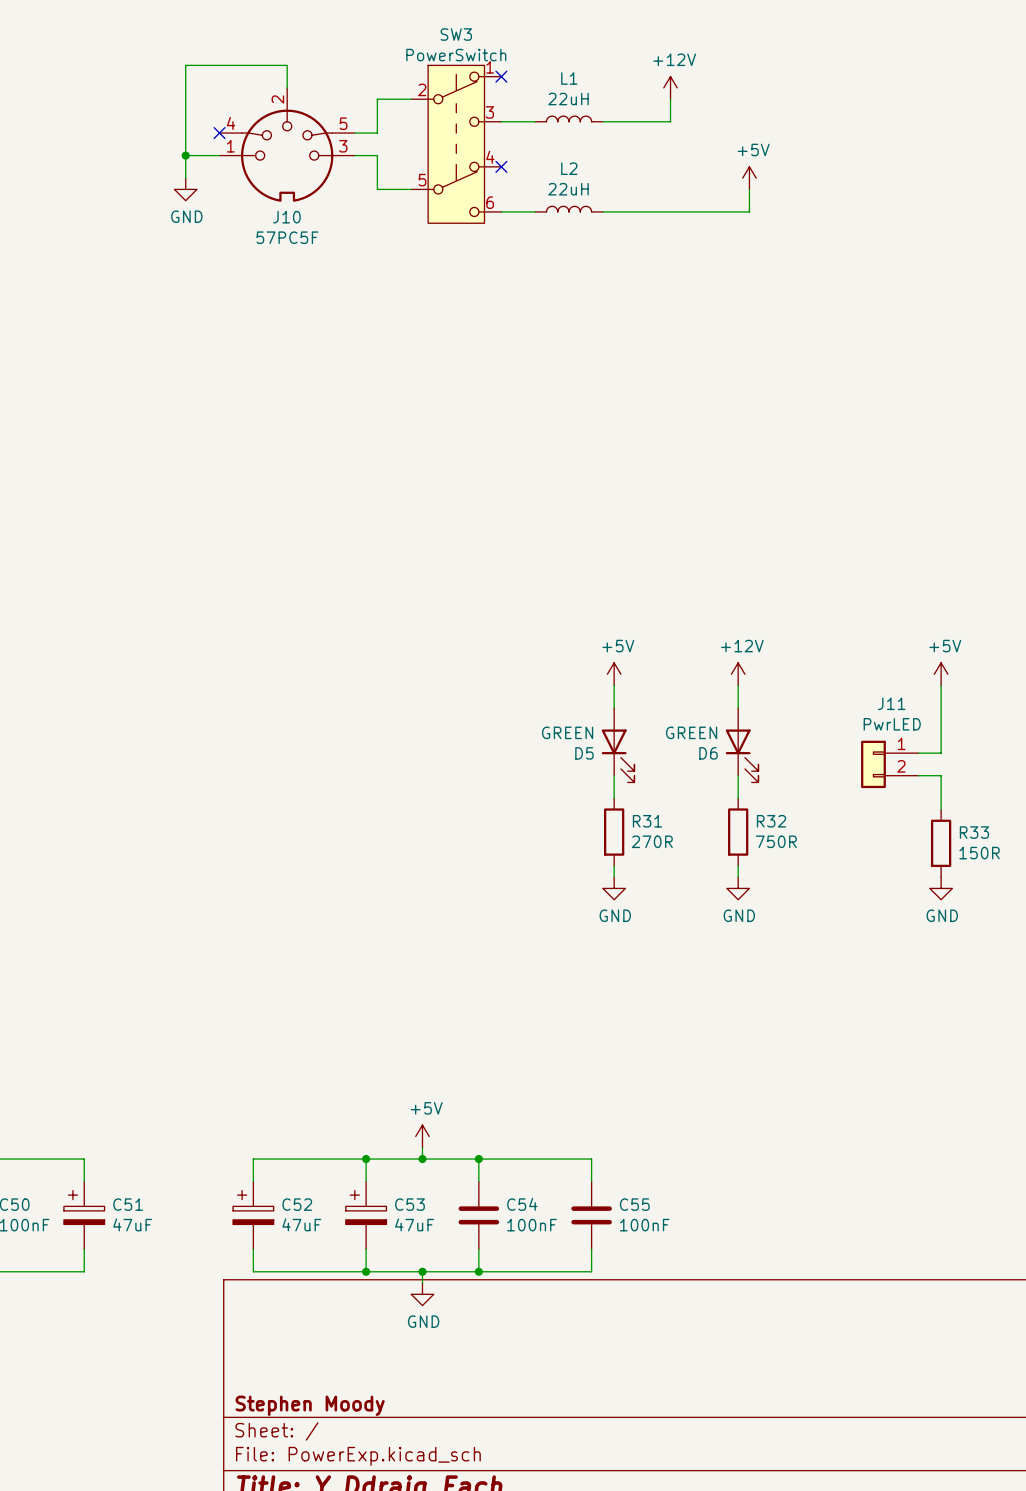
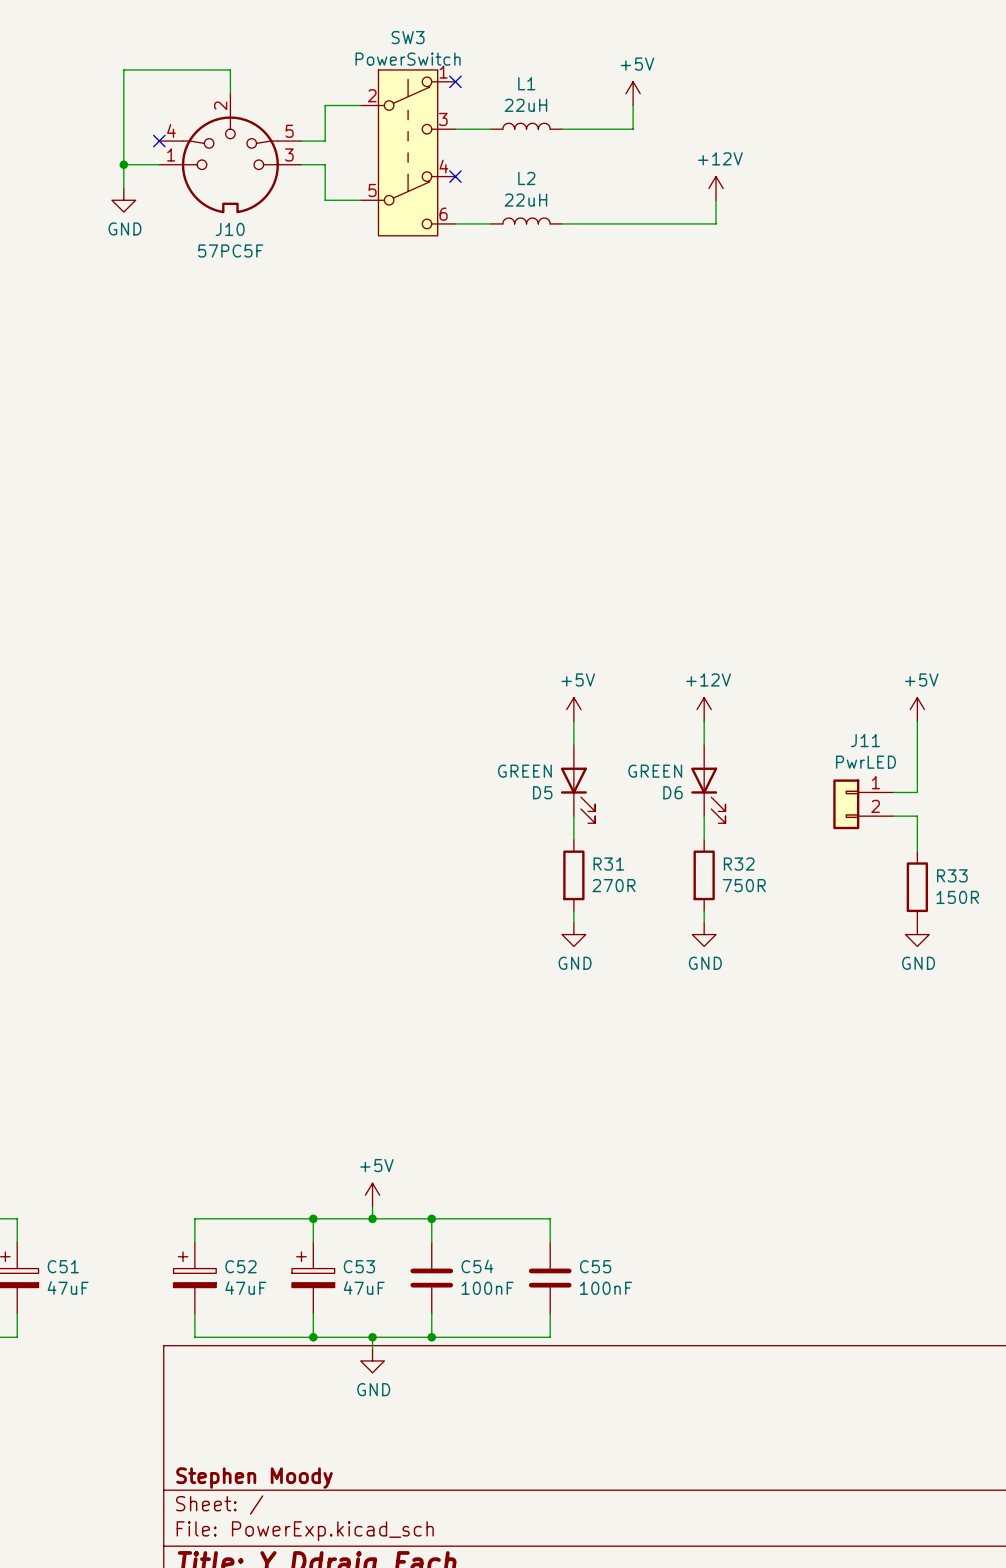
power symbol: +12V (670, 87) -> +5V (633, 93)
power symbol: +5V (749, 178) -> +12V (716, 188)

